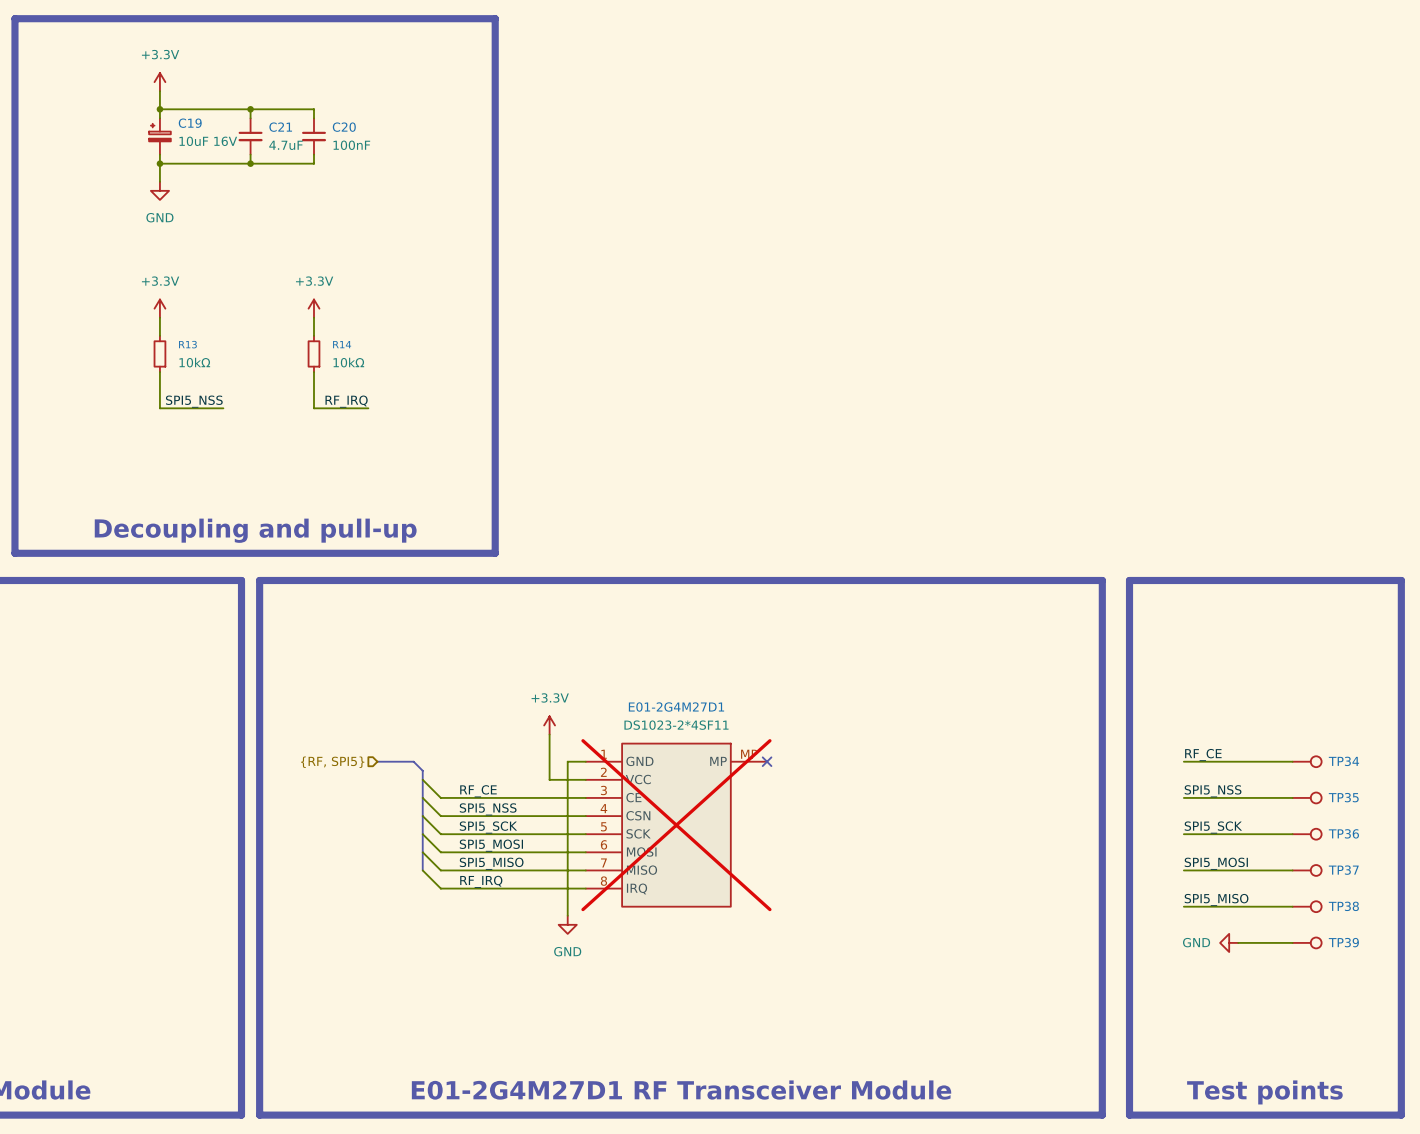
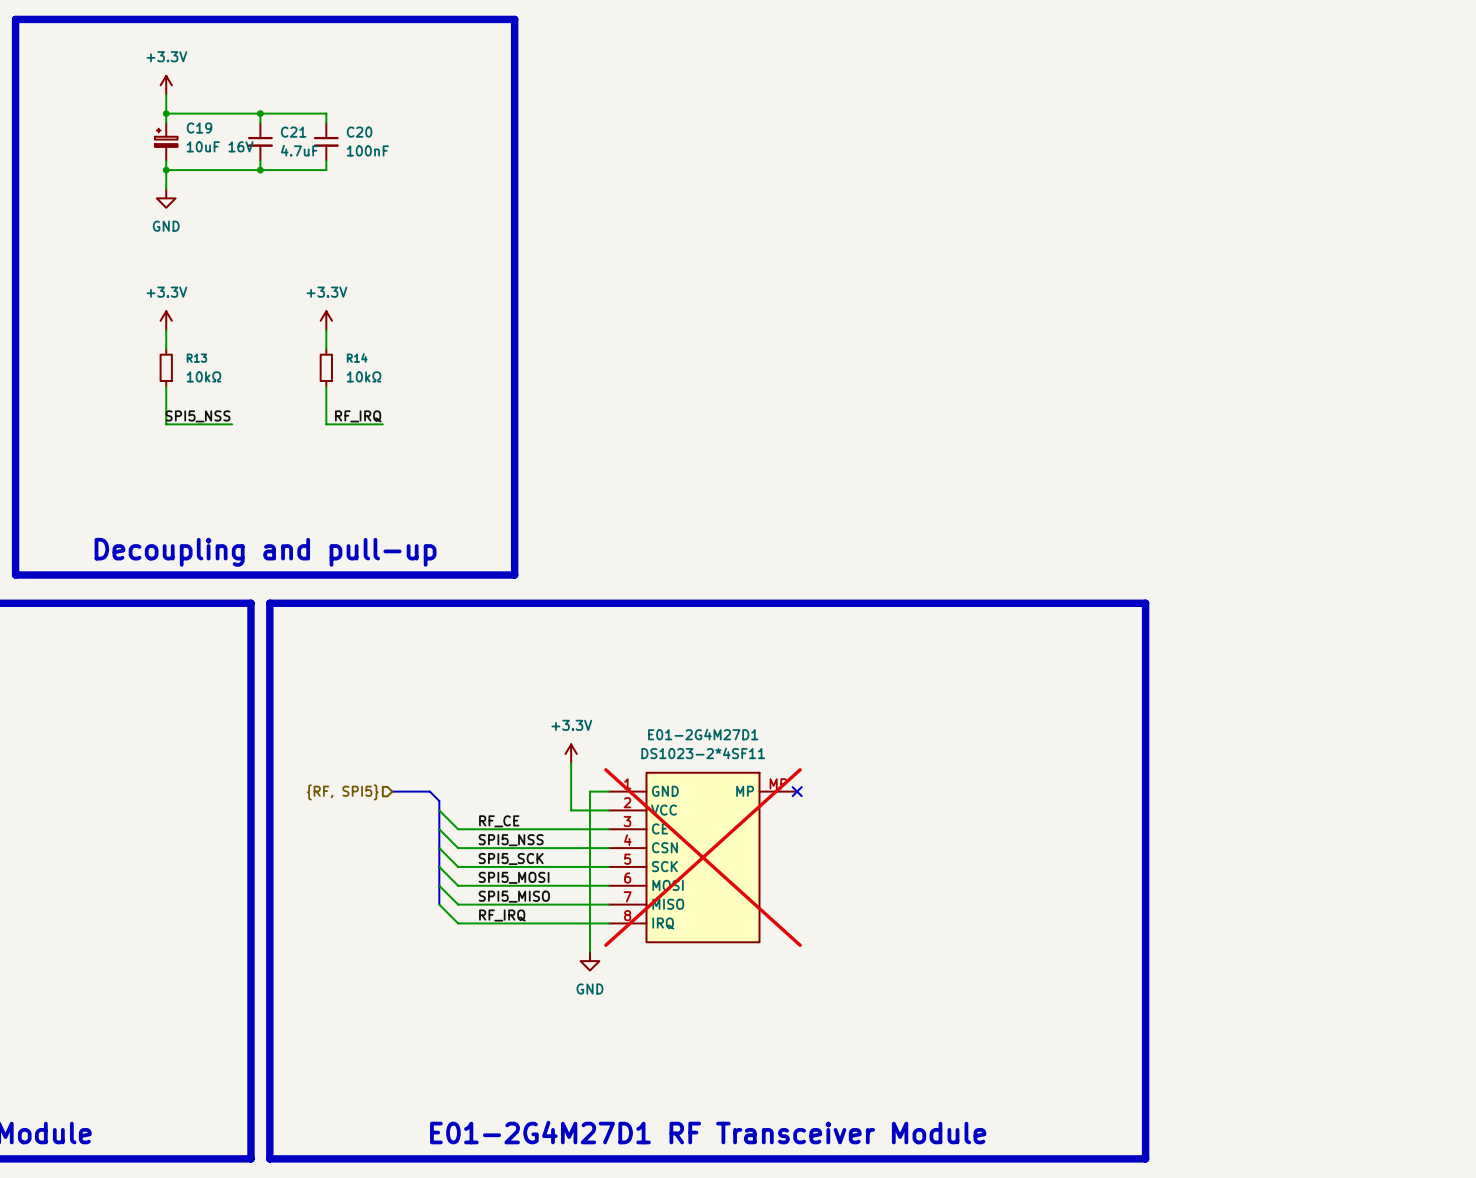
line: (1129, 580) (1401, 580) (1401, 1115) (1129, 1115) (1129, 580) -> none
label: RF_CE (1203, 755) -> none
wire: (1183, 761) (1292, 761) -> none
TP34: (1307, 761) -> none
label: SPI5_NSS (1213, 791) -> none
wire: (1183, 797) (1292, 797) -> none
TP35: (1307, 797) -> none
label: SPI5_SCK (1213, 827) -> none
wire: (1183, 834) (1292, 834) -> none
TP36: (1307, 834) -> none
label: SPI5_MOSI (1216, 863) -> none
wire: (1183, 870) (1292, 870) -> none
TP37: (1307, 870) -> none
label: SPI5_MISO (1216, 899) -> none
wire: (1183, 906) (1292, 906) -> none
TP38: (1307, 906) -> none
power symbol: GND (1229, 942) -> none
wire: (1238, 942) (1292, 942) -> none
TP39: (1307, 942) -> none
text: Test points (1264, 1092) -> none

